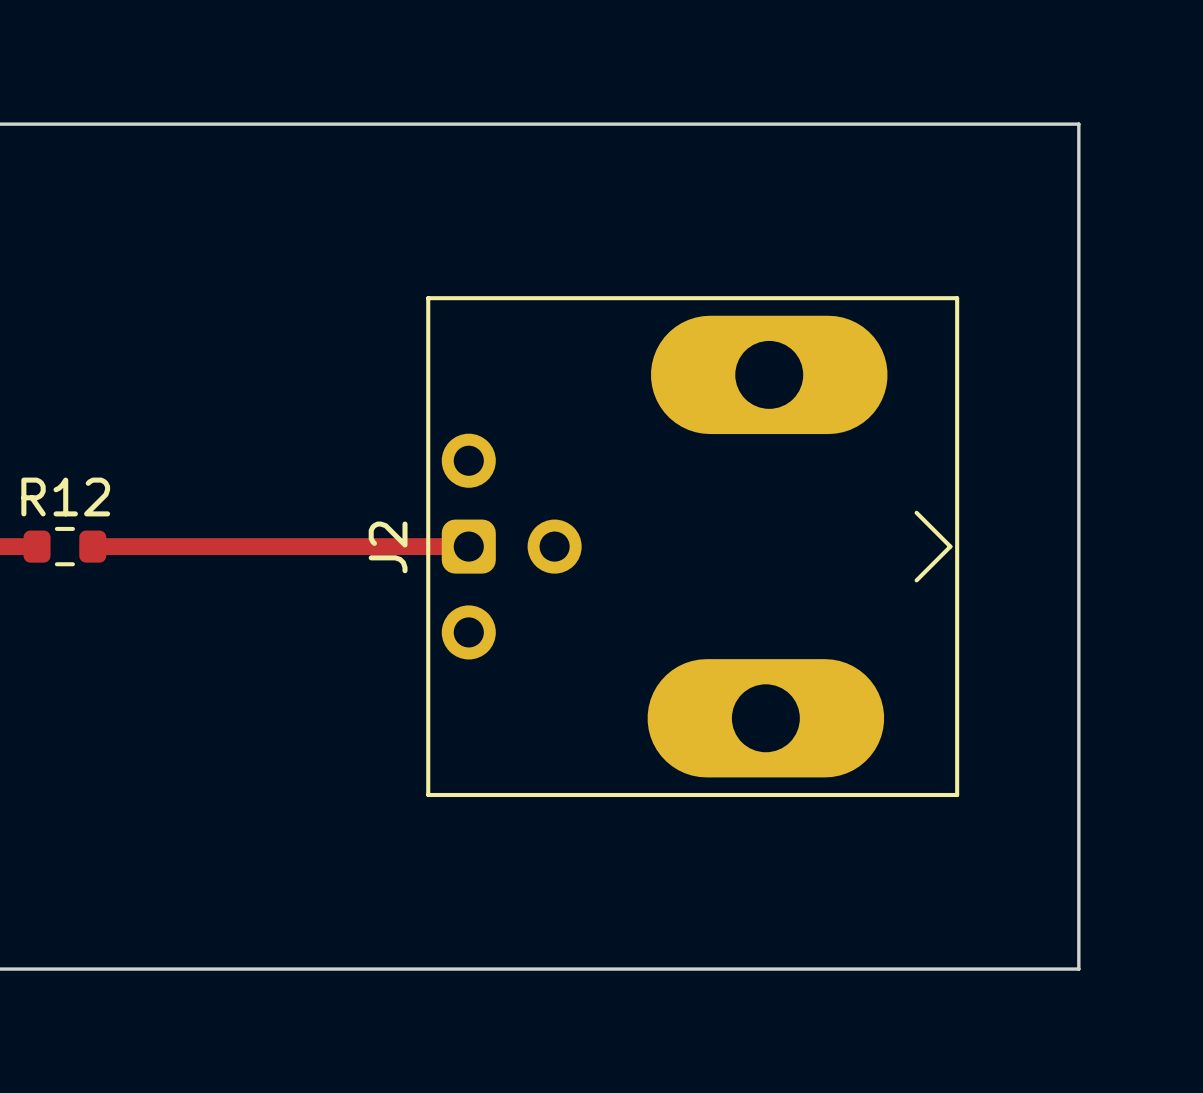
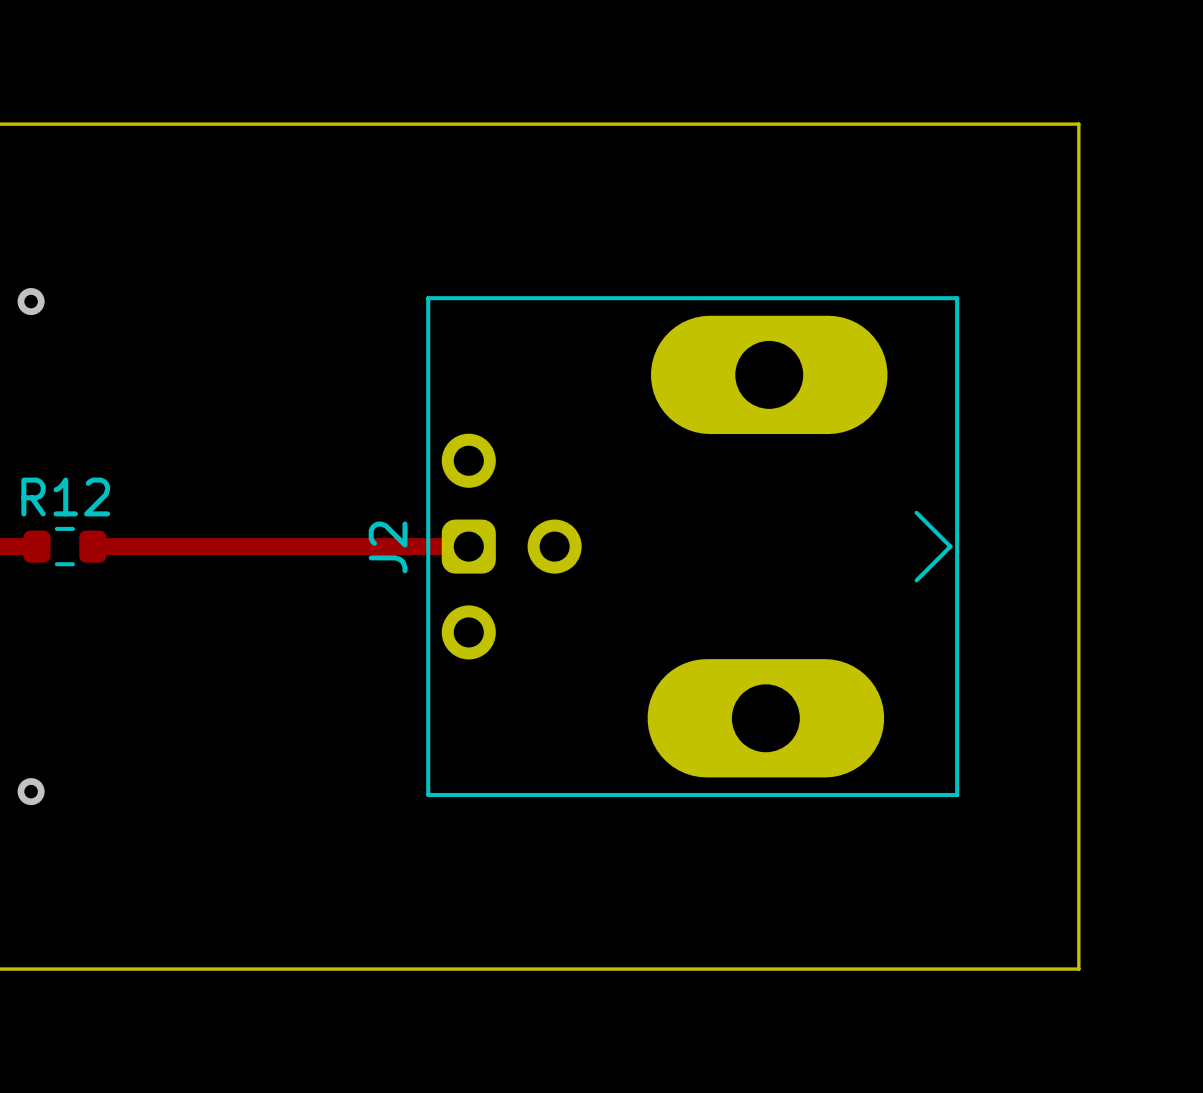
via: none -> (31, 301)
via: none -> (31, 791)

